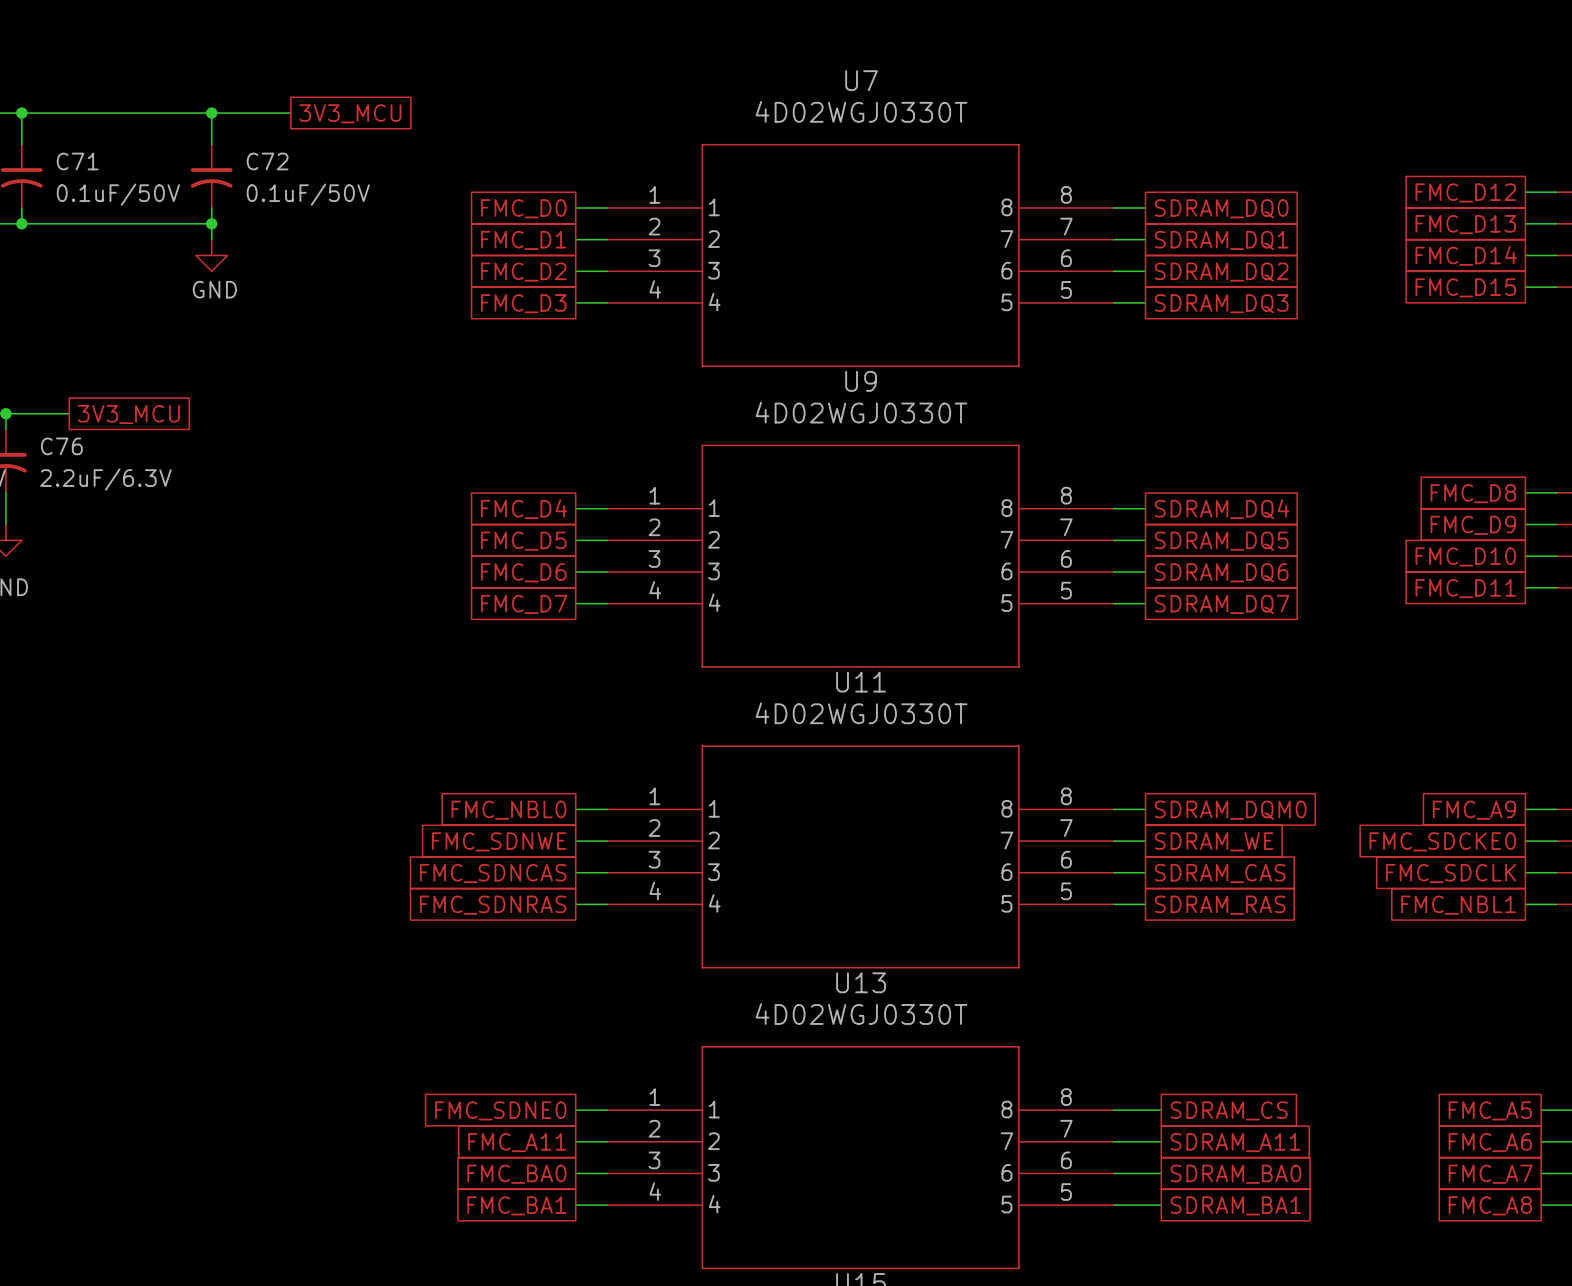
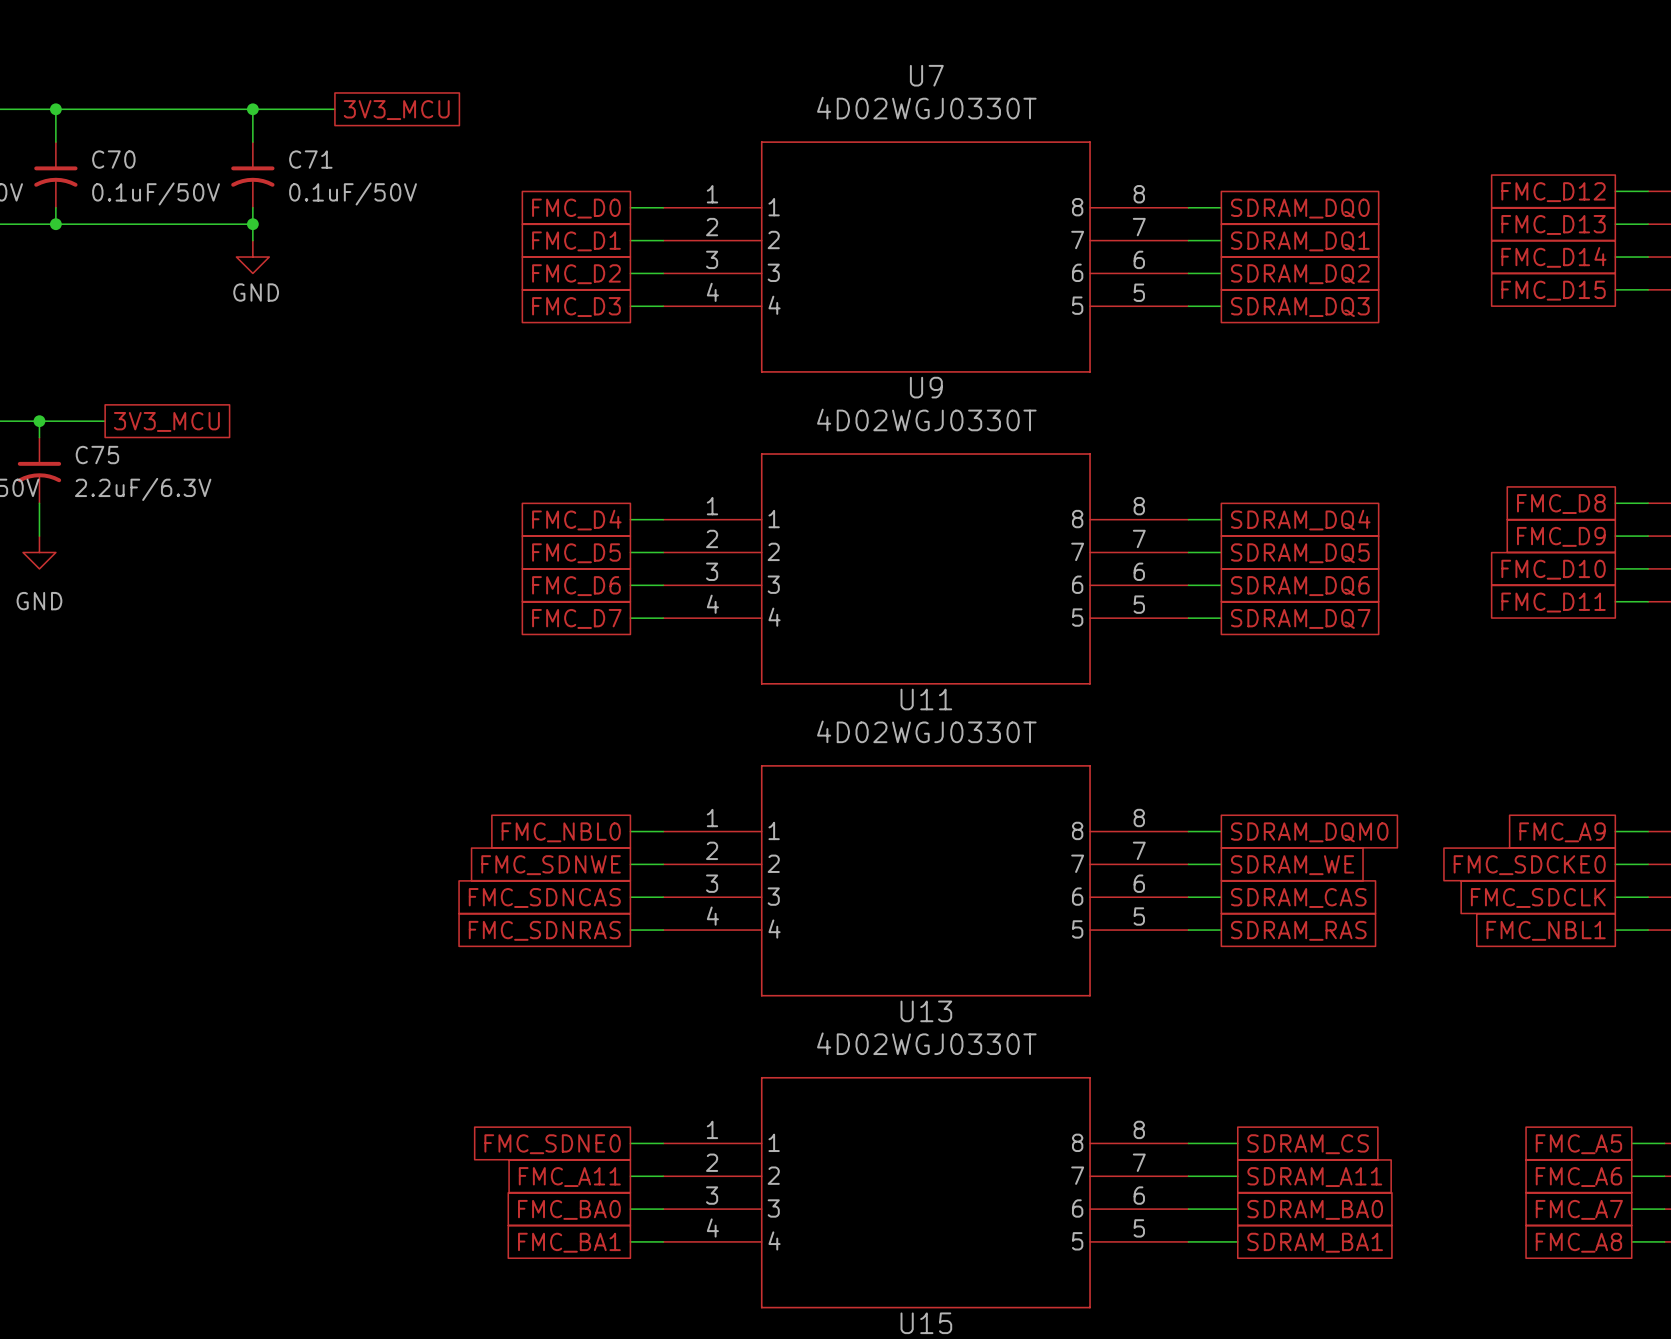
C71 name: C71 (77, 161) -> C70 (113, 159)
C72 name: C72 (267, 161) -> C71 (310, 159)
C76 name: C76 (61, 446) -> C75 (97, 455)

